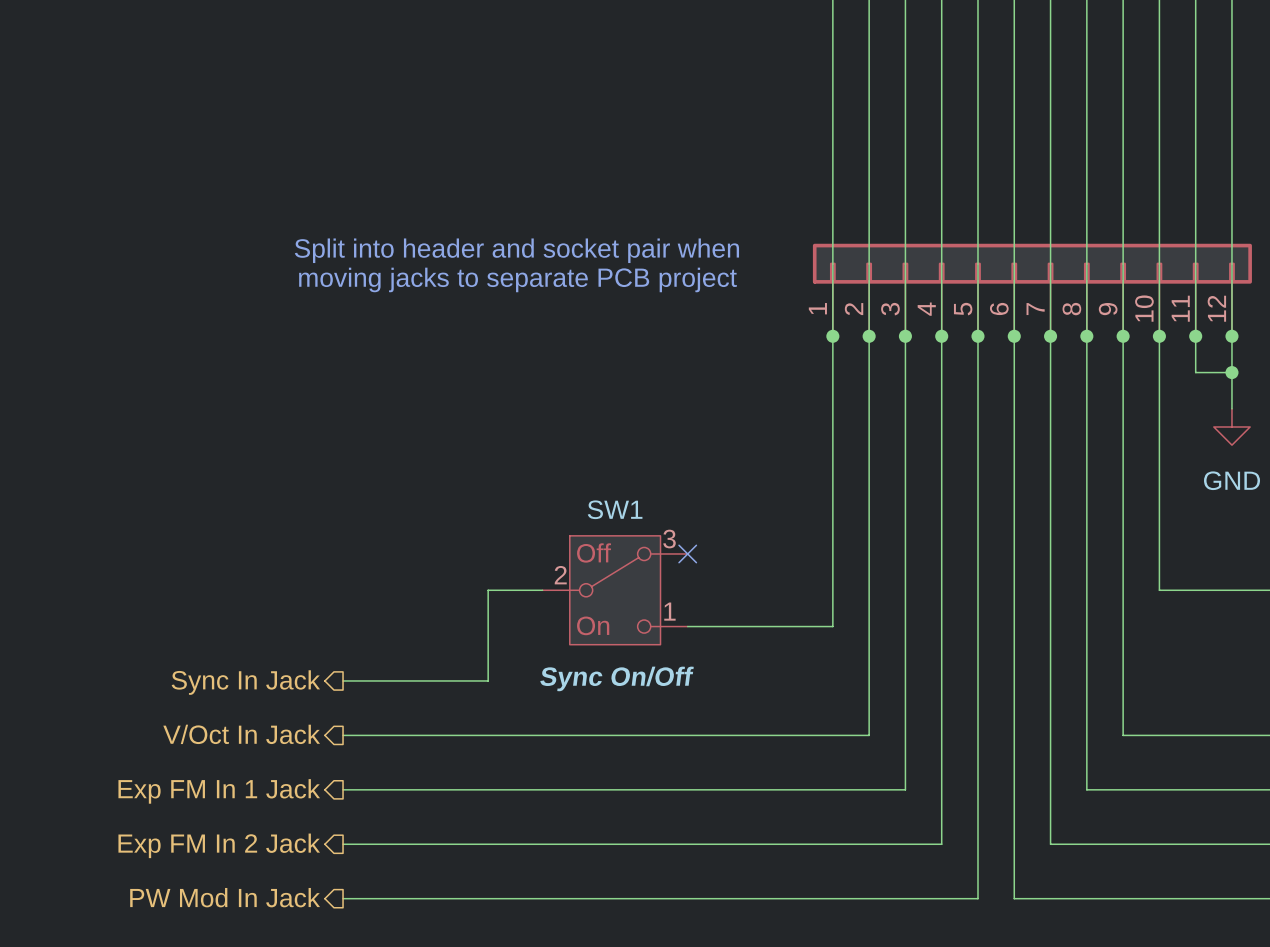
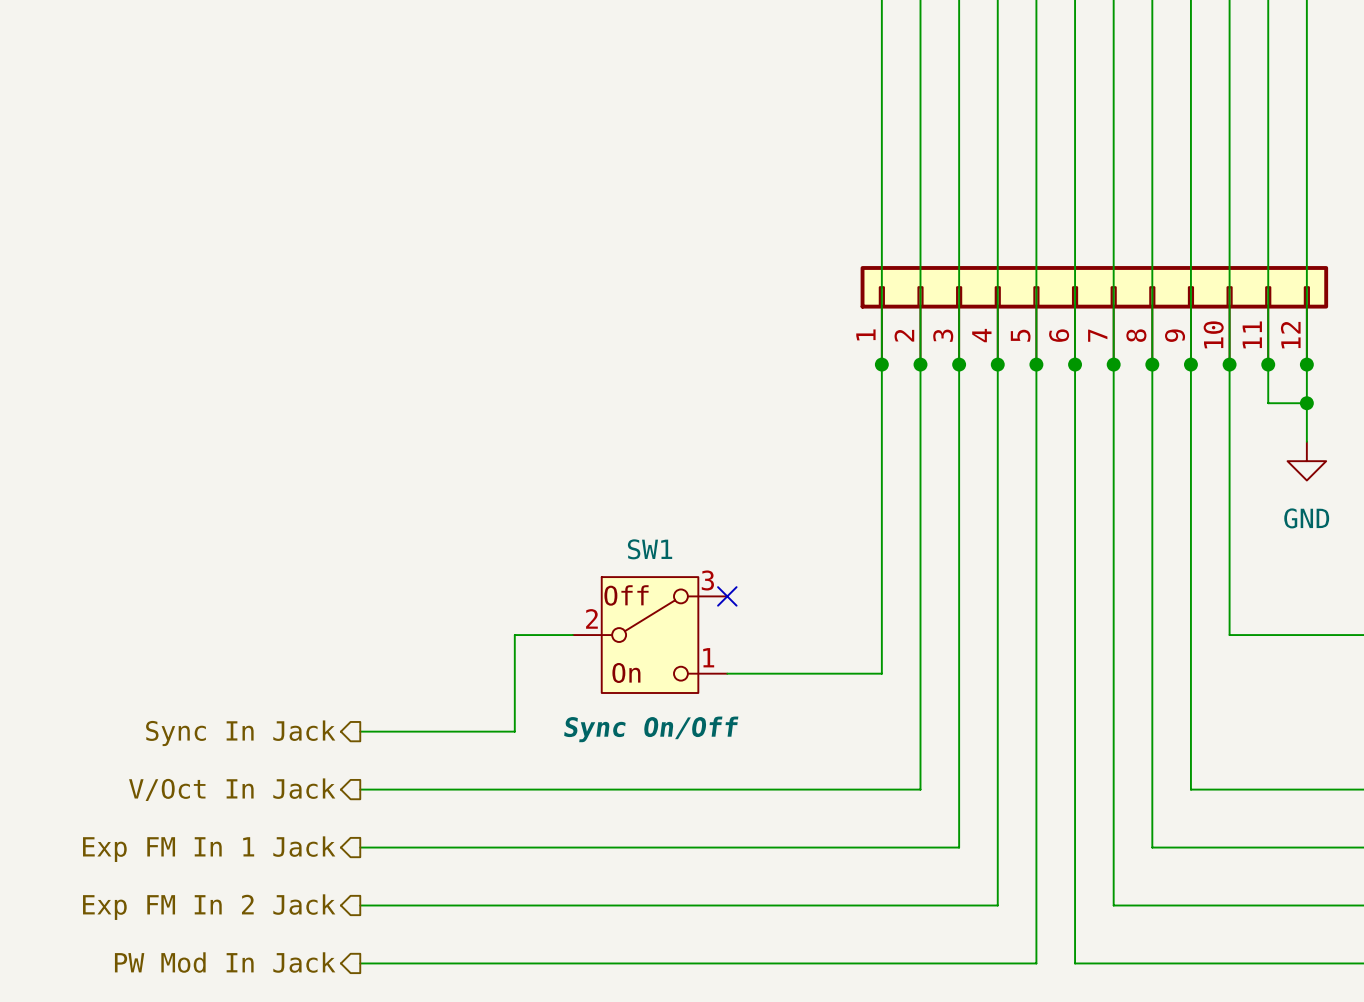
text: Split into header and socket pair when (516, 250) -> none
text: moving jacks to separate PCB project (517, 279) -> none

